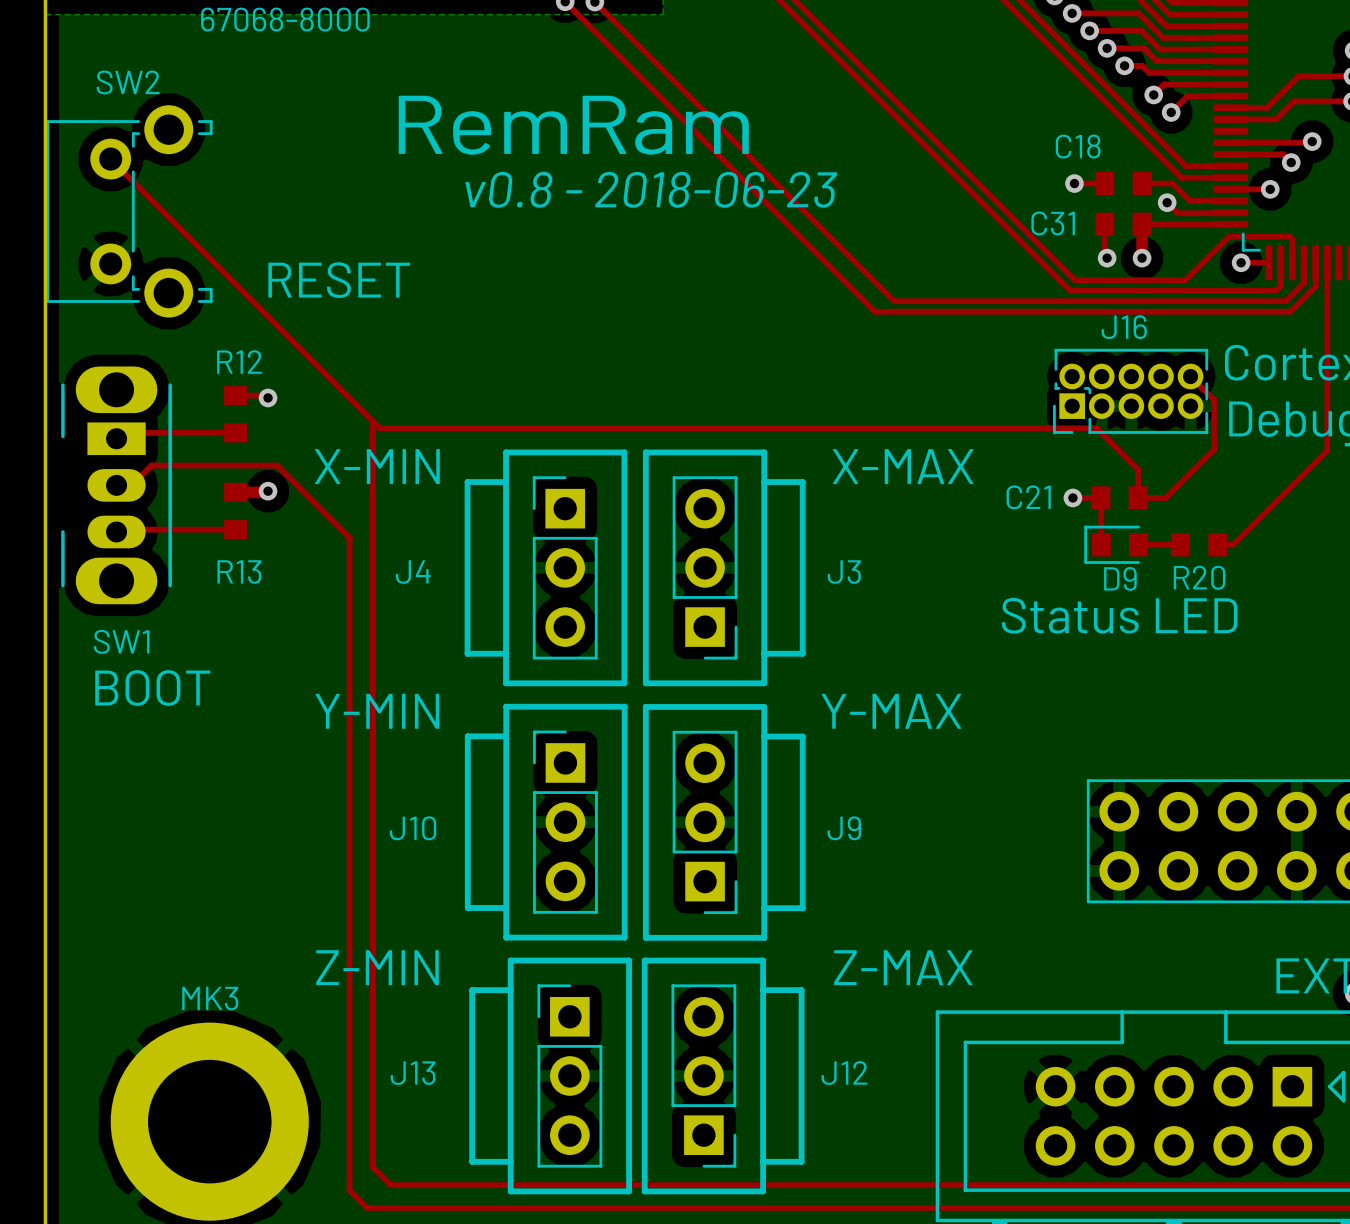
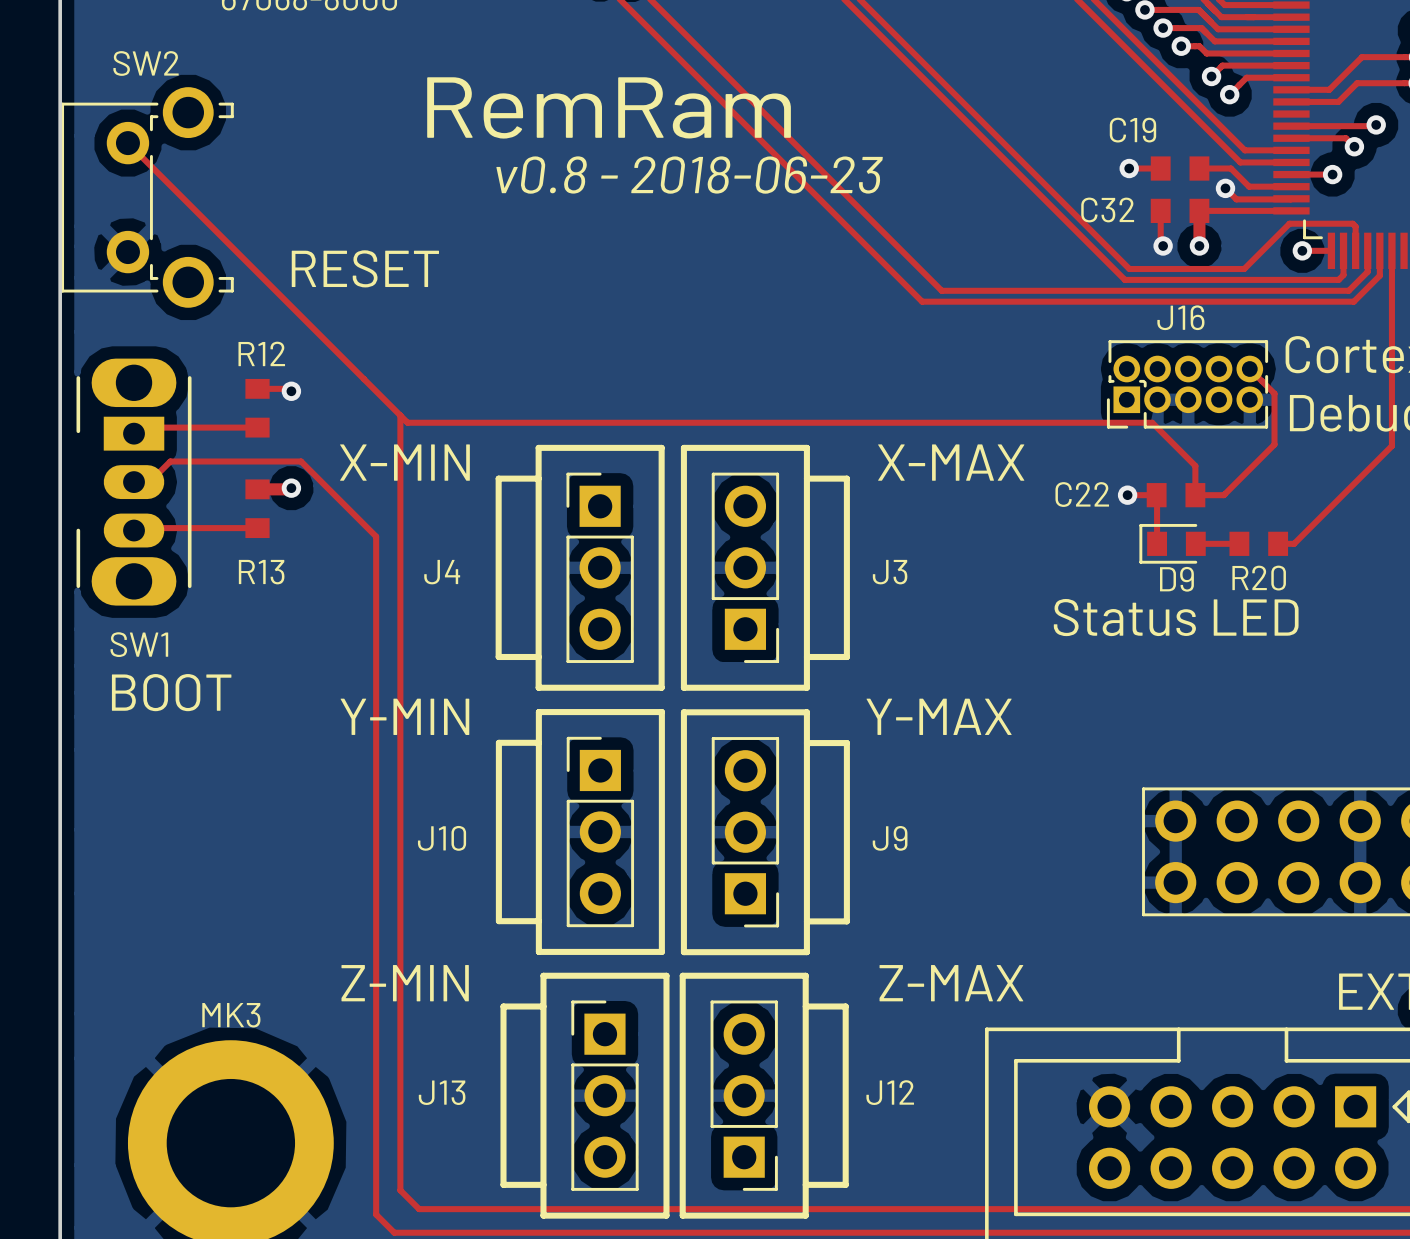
C18 name: C18 (1078, 146) -> C19 (1132, 130)
C31 name: C31 (1053, 223) -> C32 (1107, 210)
C21 name: C21 (1028, 497) -> C22 (1082, 494)

